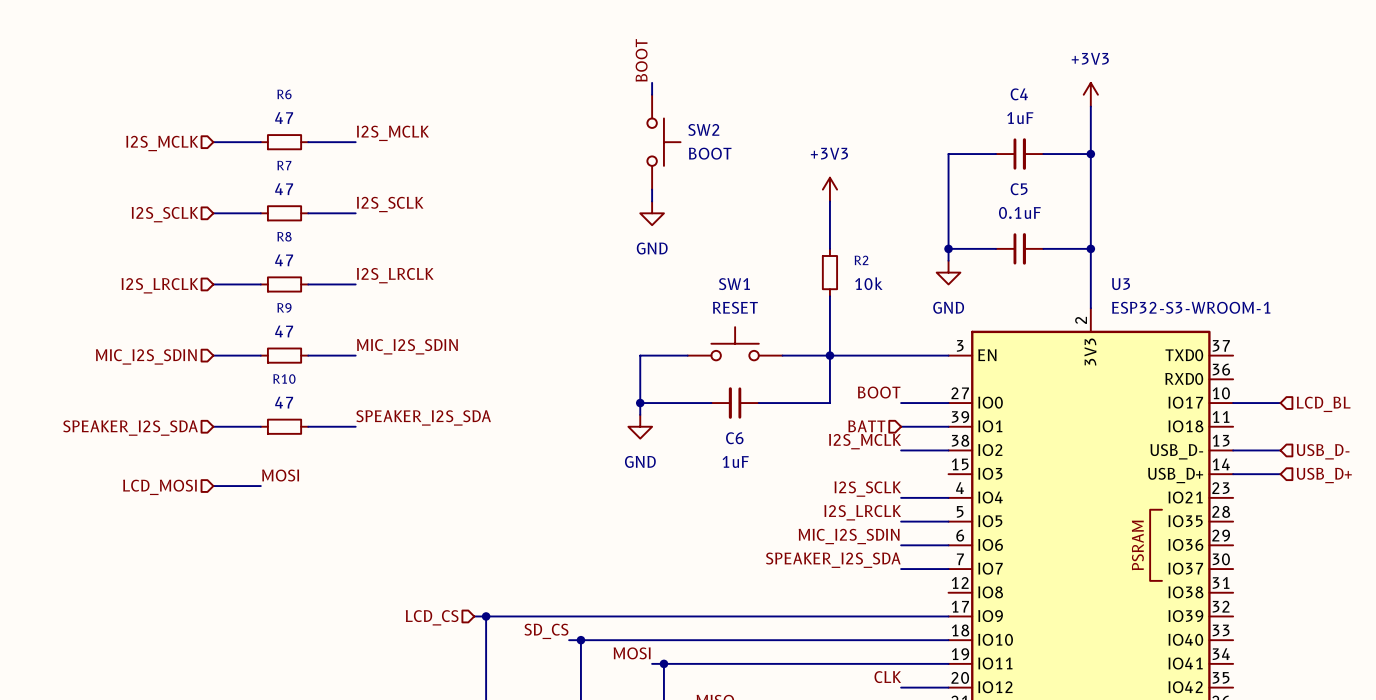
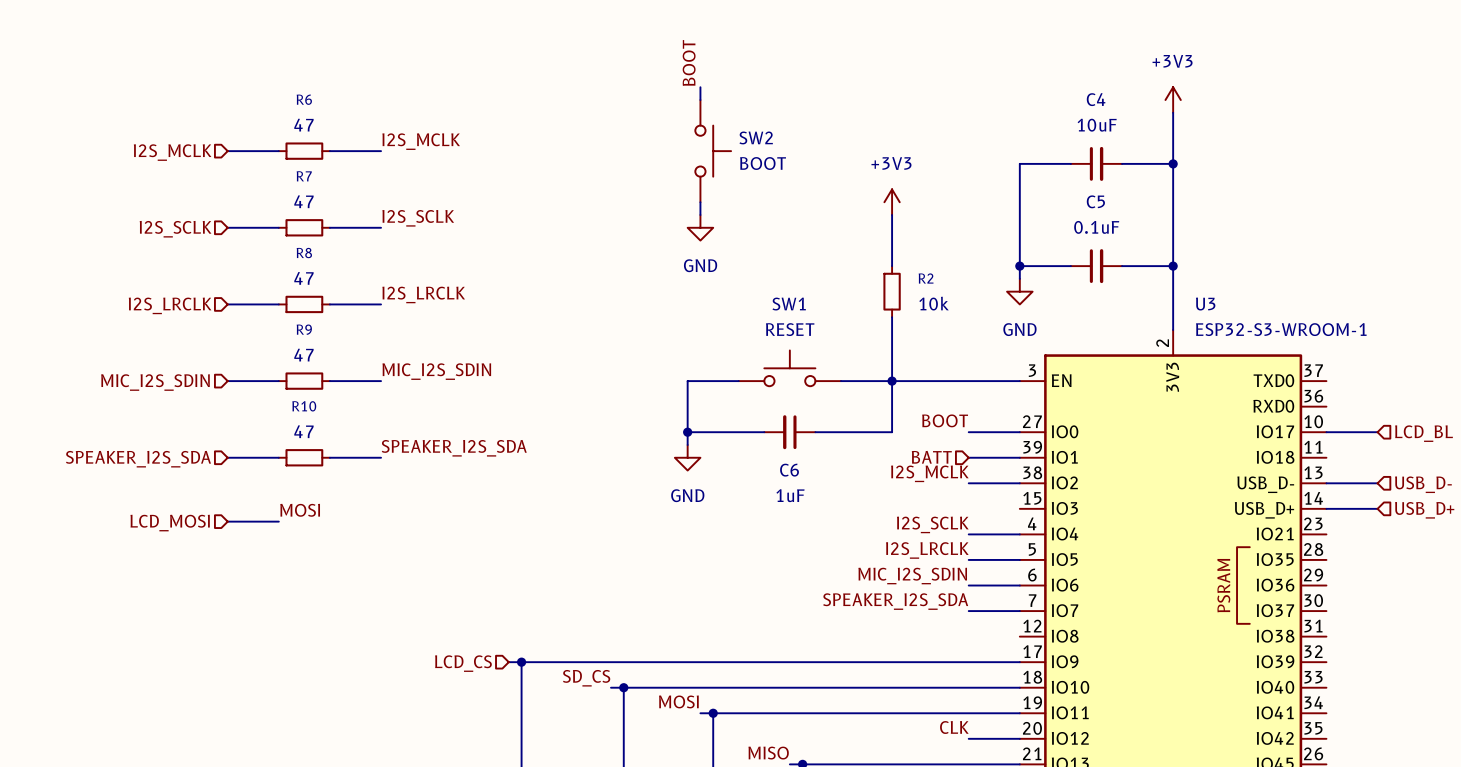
C4 value: 1uF (1020, 118) -> 10uF (1097, 125)

